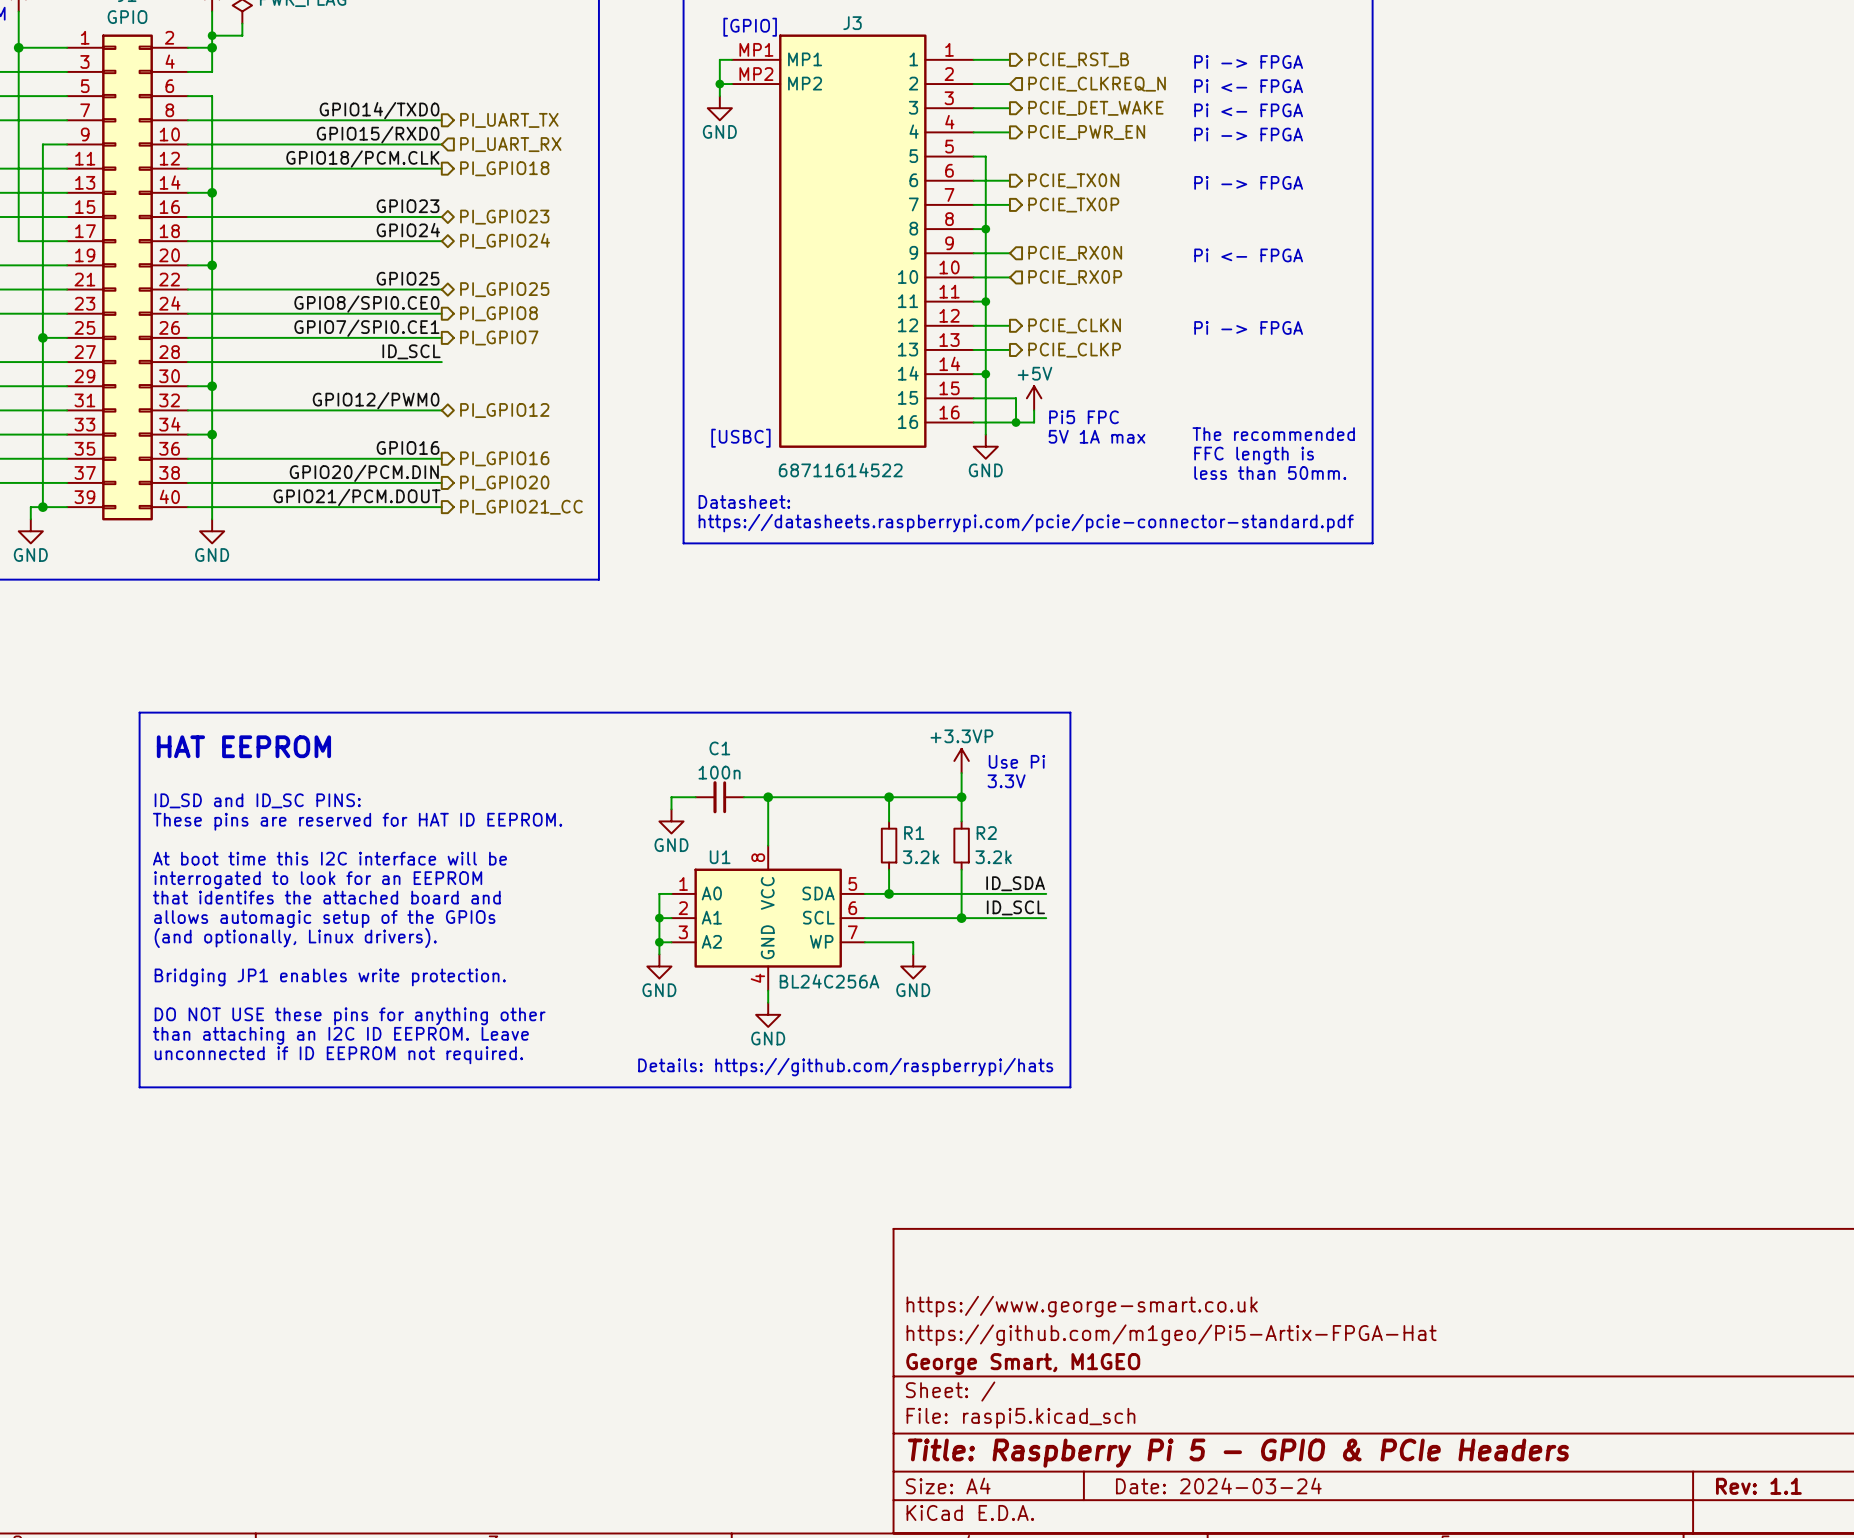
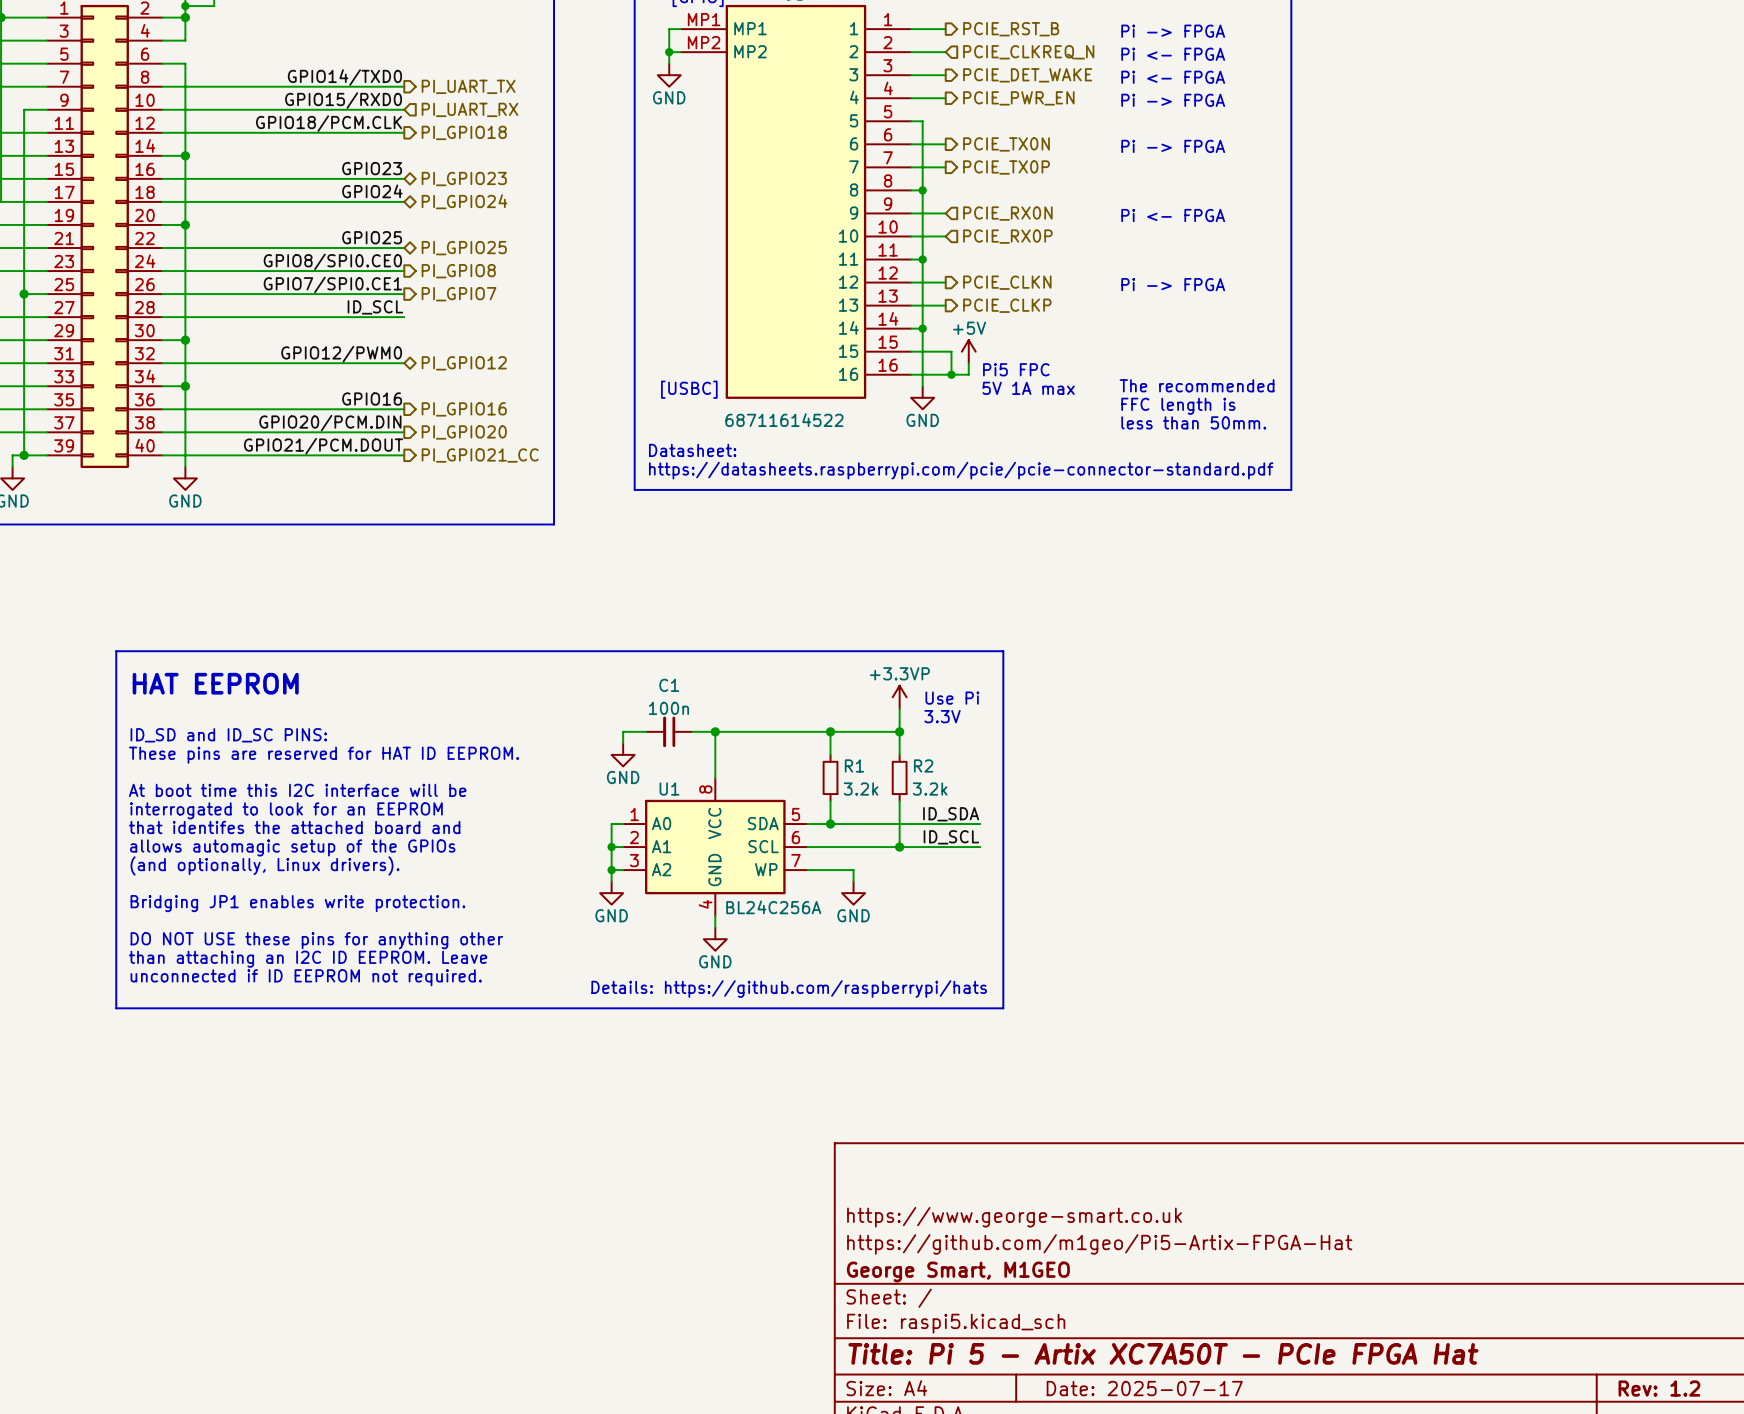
title block: Title: Raspberry Pi 5 - GPIO & PCIe Headers (1238, 1453) -> Title: Pi 5 - Artix XC7A50T - PCIe FPGA Hat (1163, 1353)
title block: Date: 2024-03-24 (1218, 1485) -> Date: 2025-07-17 (1144, 1388)
title block: Rev: 1.1 (1758, 1486) -> Rev: 1.2 (1659, 1388)

